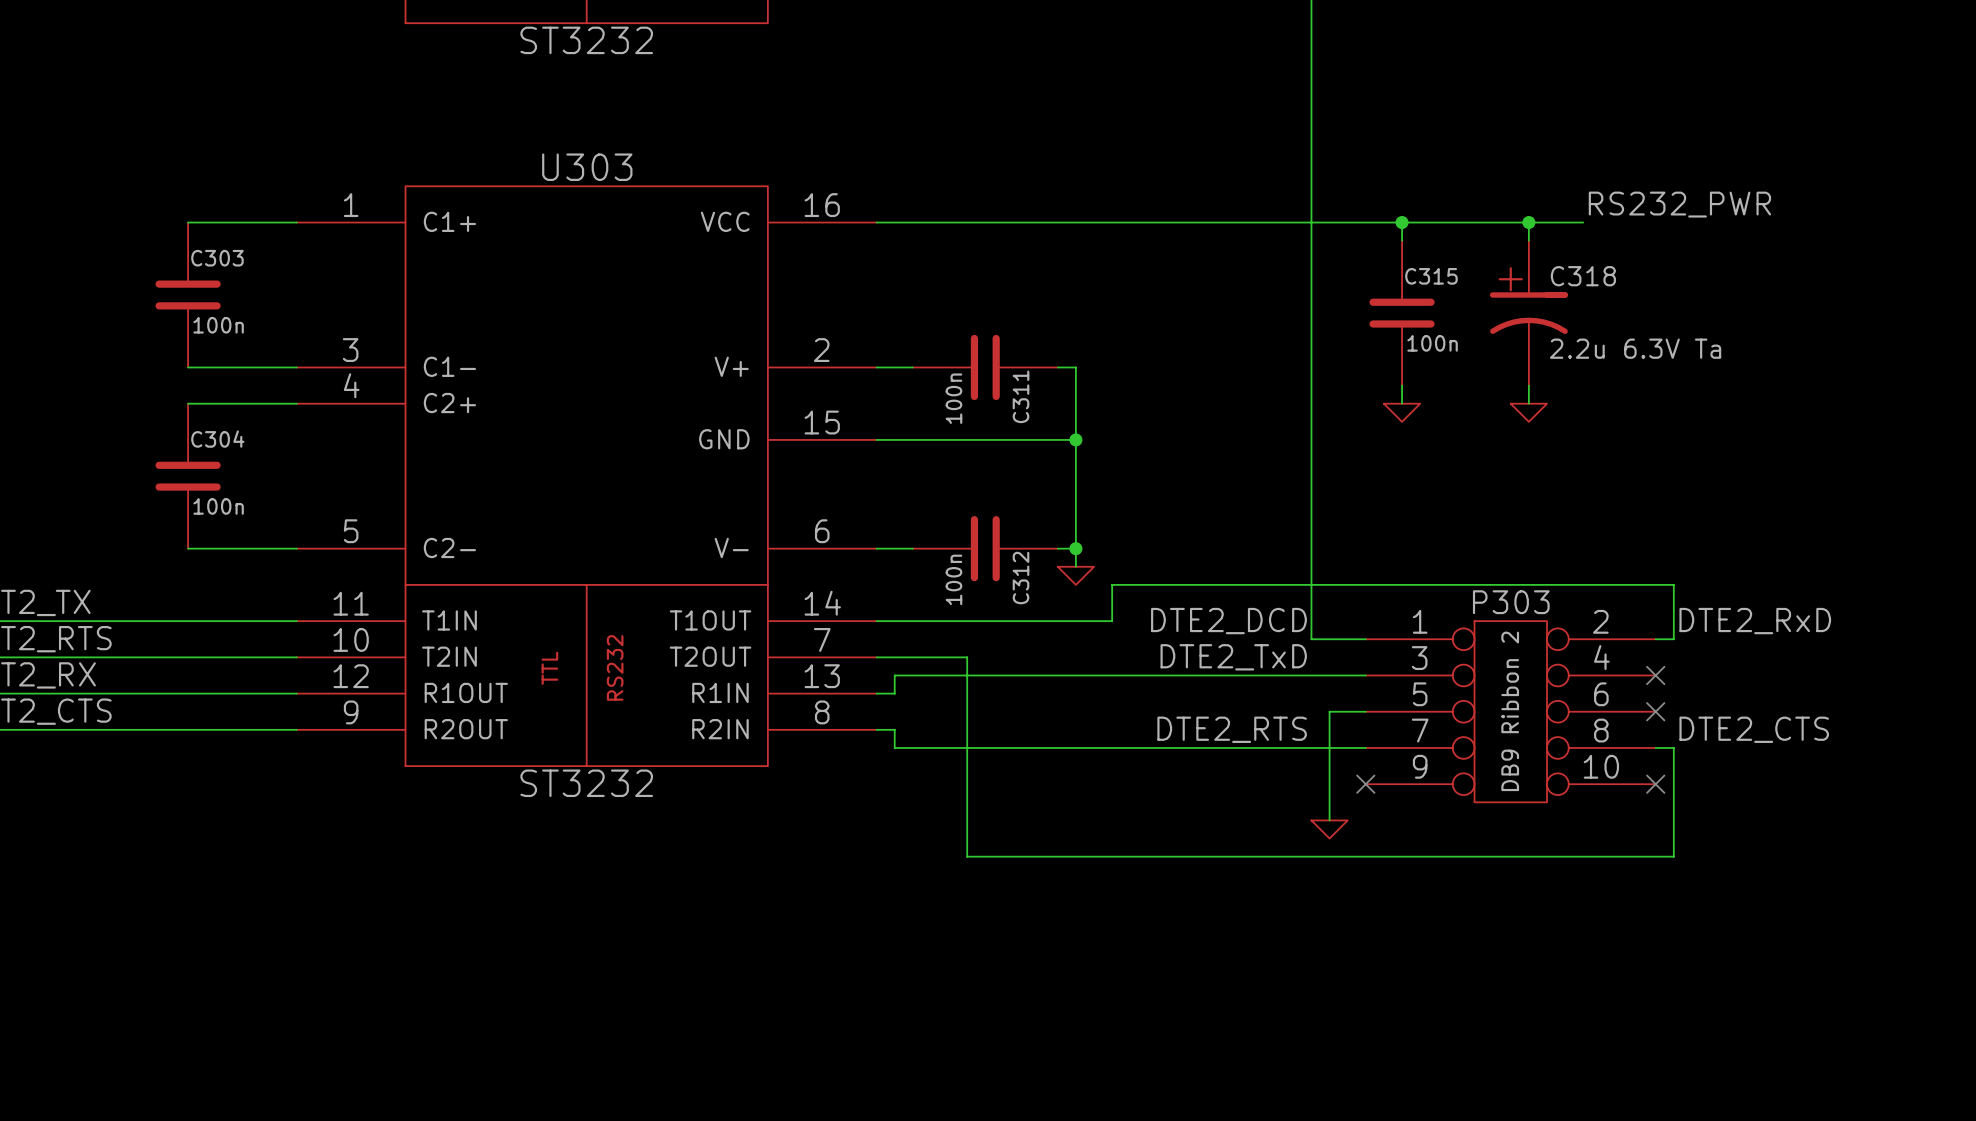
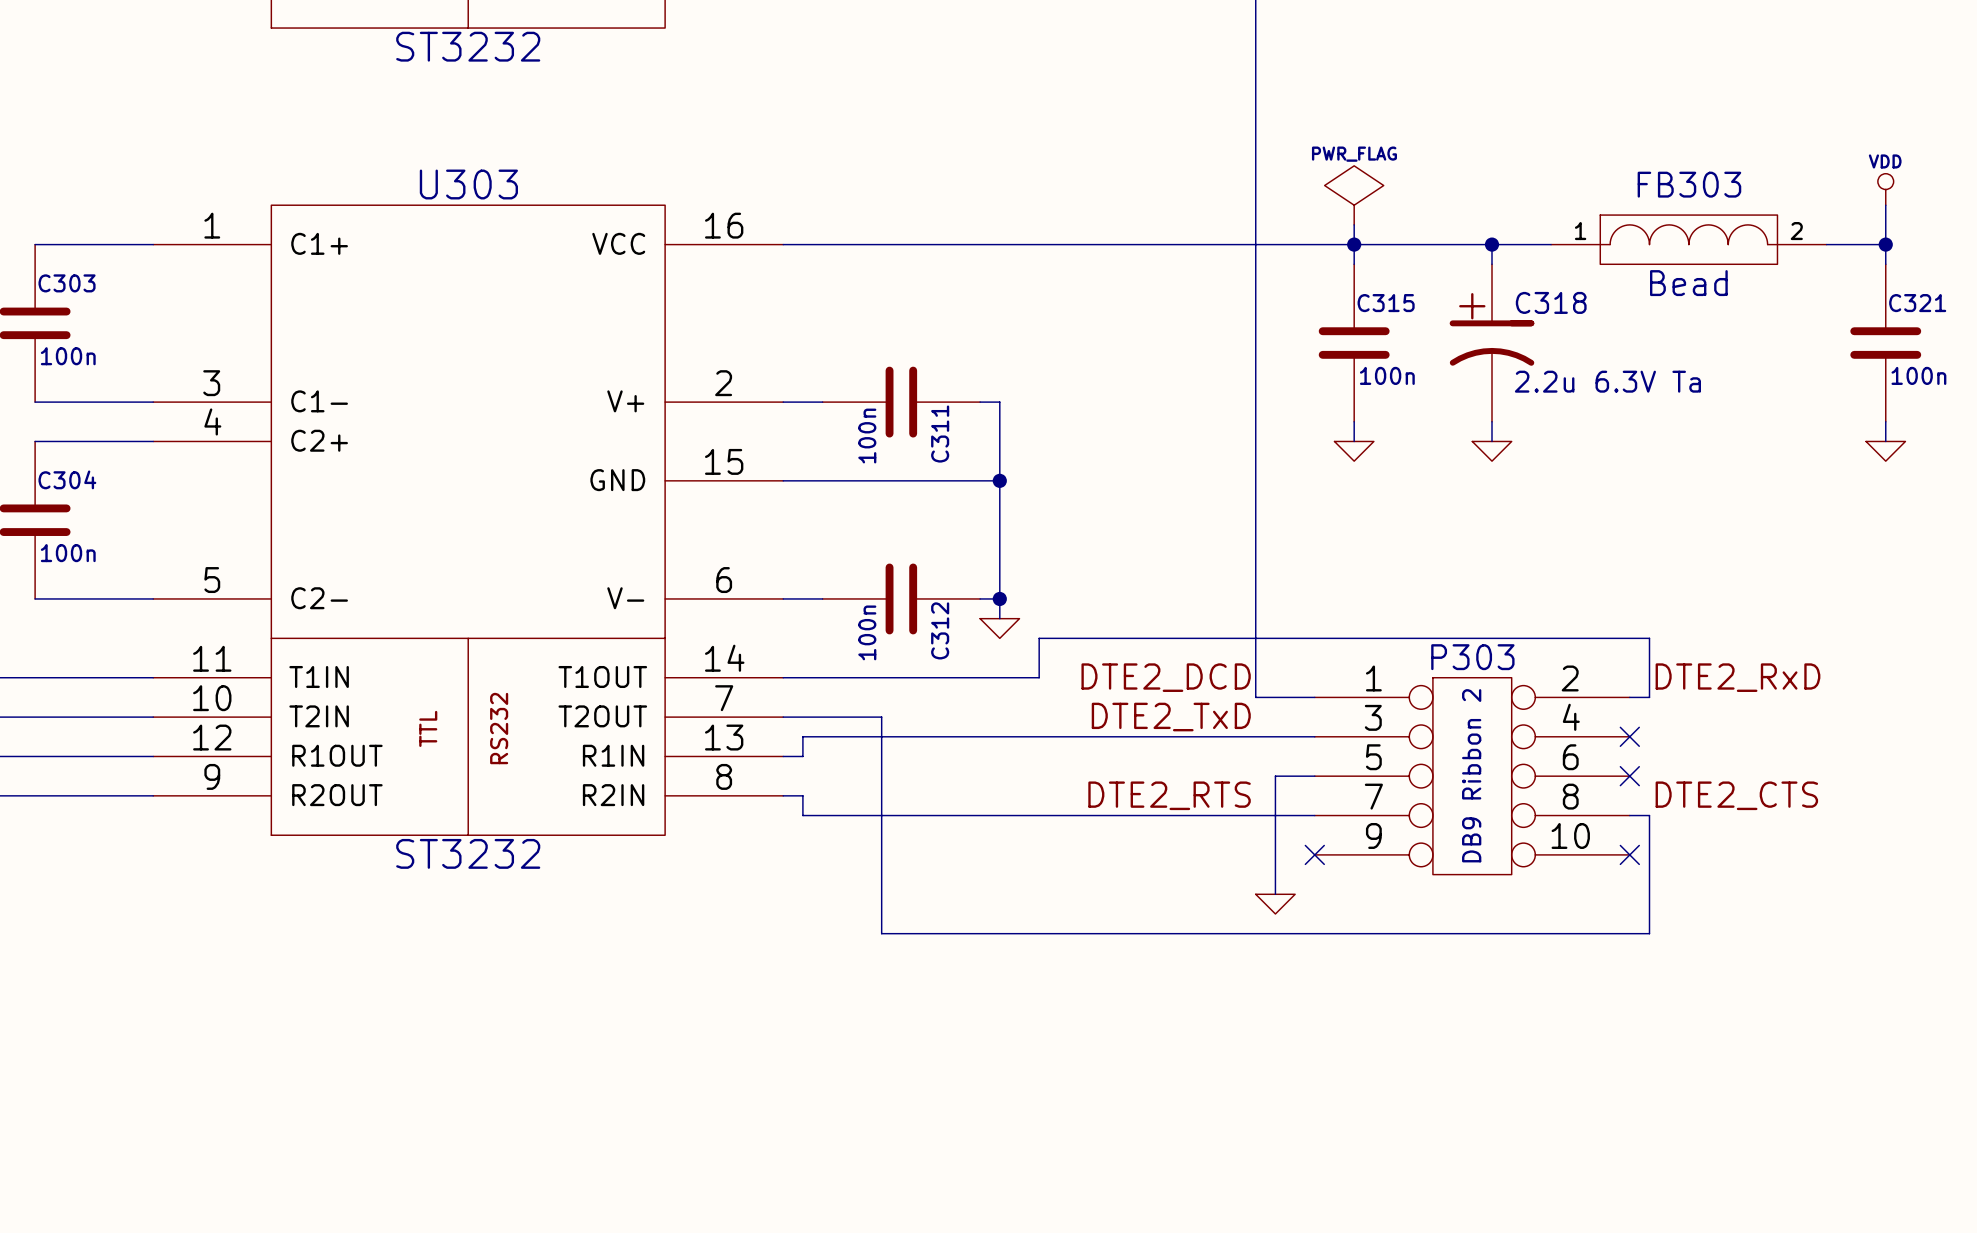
power symbol: none -> VDD (1885, 189)
power symbol: none -> PWR_FLAG (1354, 195)
wire: none -> (1885, 205) (1885, 264)
wire: none -> (1354, 224) (1354, 244)
label: RS232_PWR (1679, 204) -> none
FB303: none -> Bead (1688, 239)
wire: none -> (1826, 244) (1885, 244)
junction: none -> (1885, 244)
C321: none -> 100n (1885, 343)
wire: none -> (1885, 421) (1885, 441)
power symbol: none -> (1885, 451)

